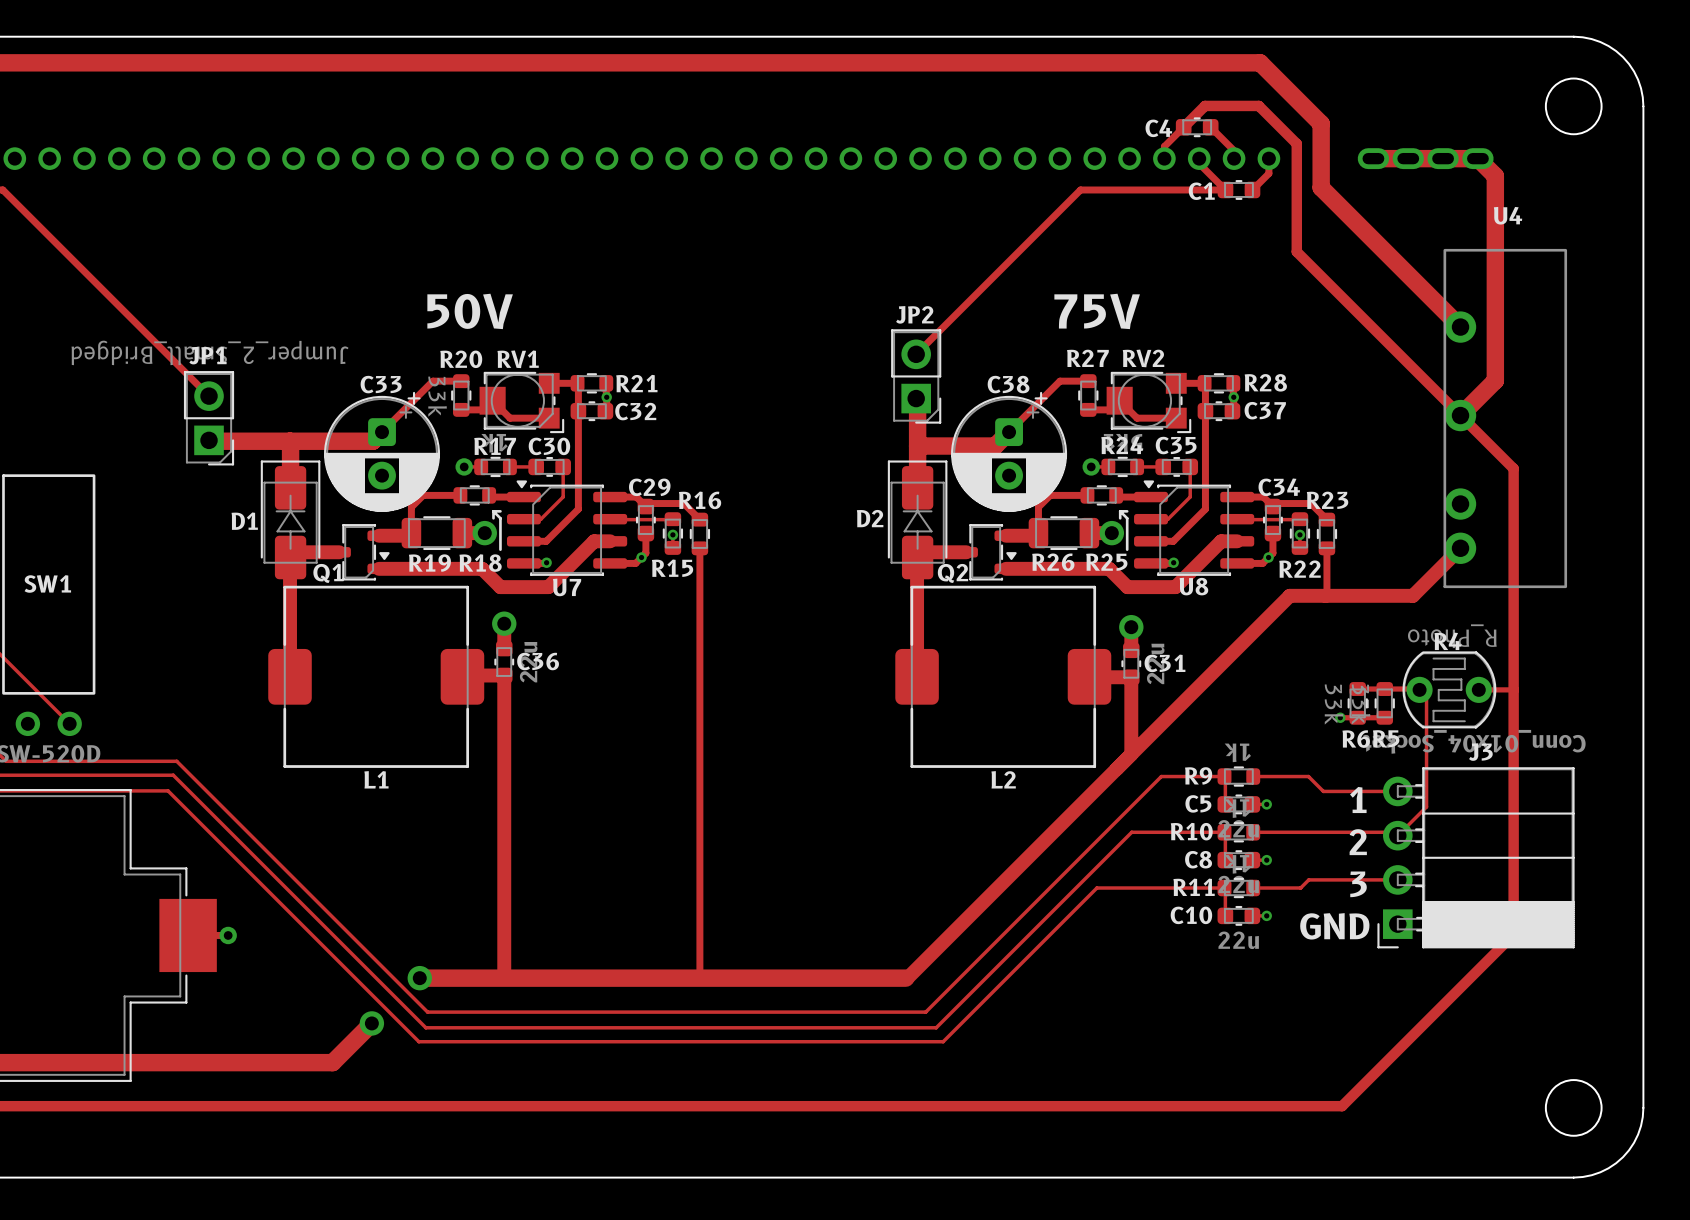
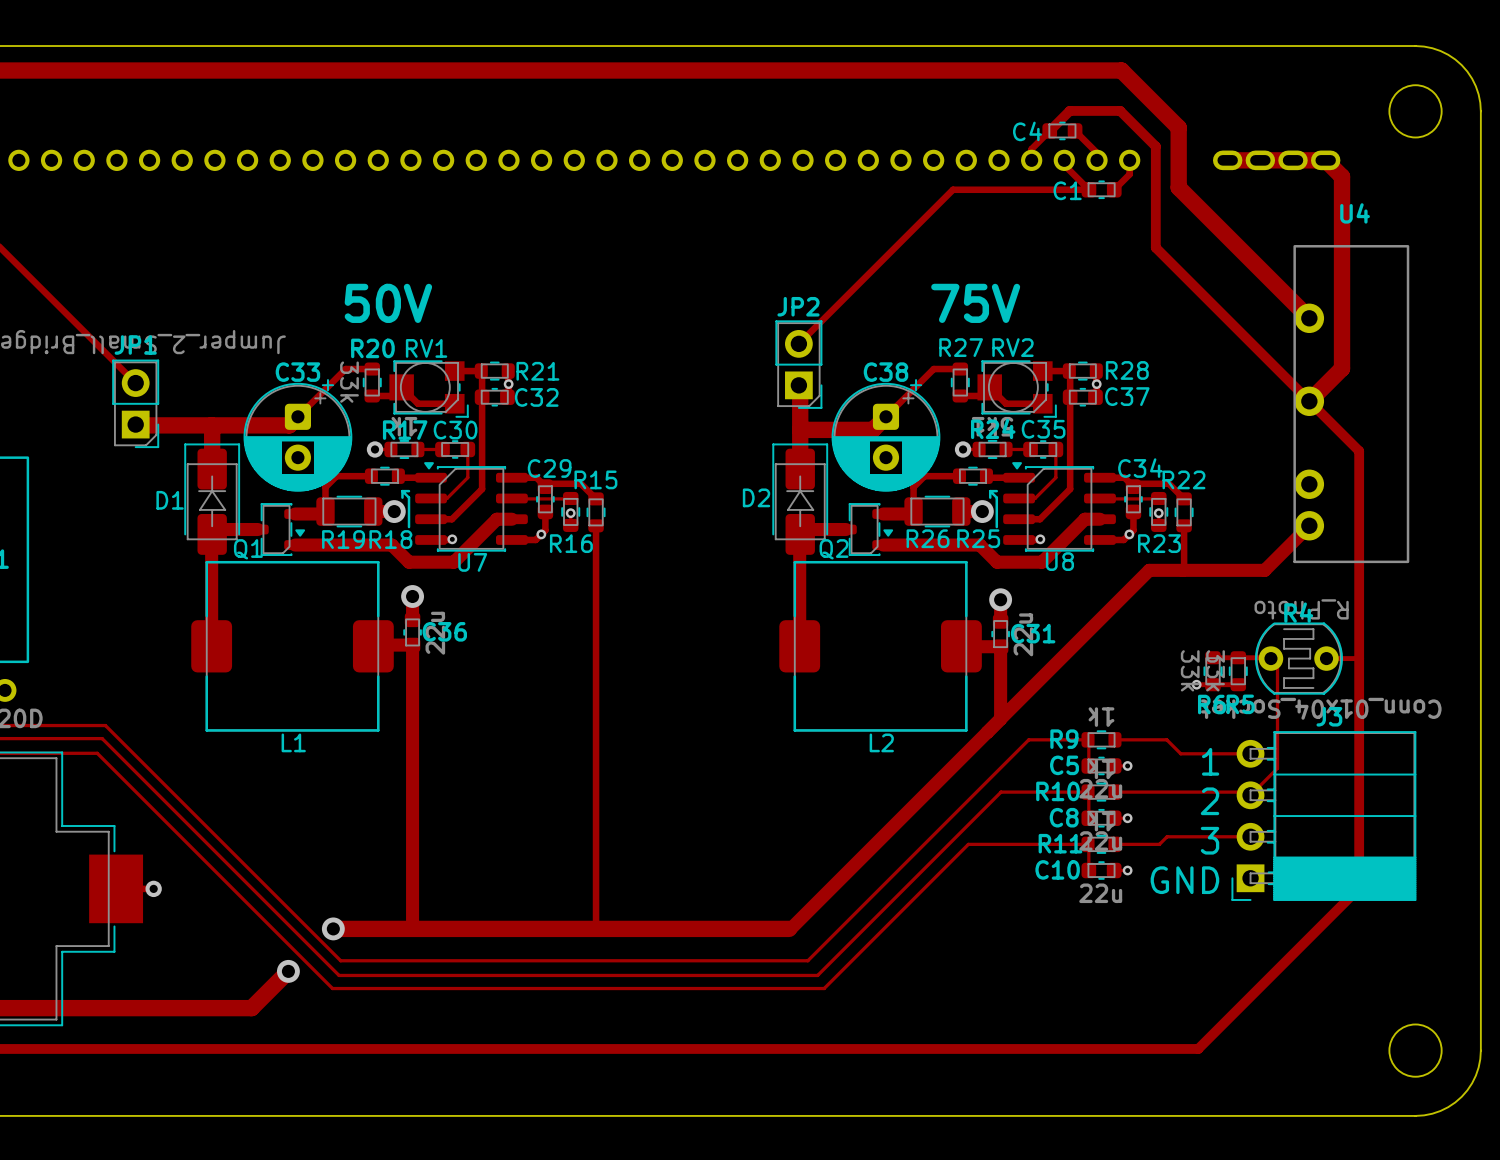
R16 name position: R16 (700, 500) -> R16 (571, 543)
R23 name position: R23 (1327, 500) -> R23 (1159, 543)
R15 name position: R15 (672, 568) -> R15 (595, 479)
R22 name position: R22 (1299, 569) -> R22 (1183, 479)

